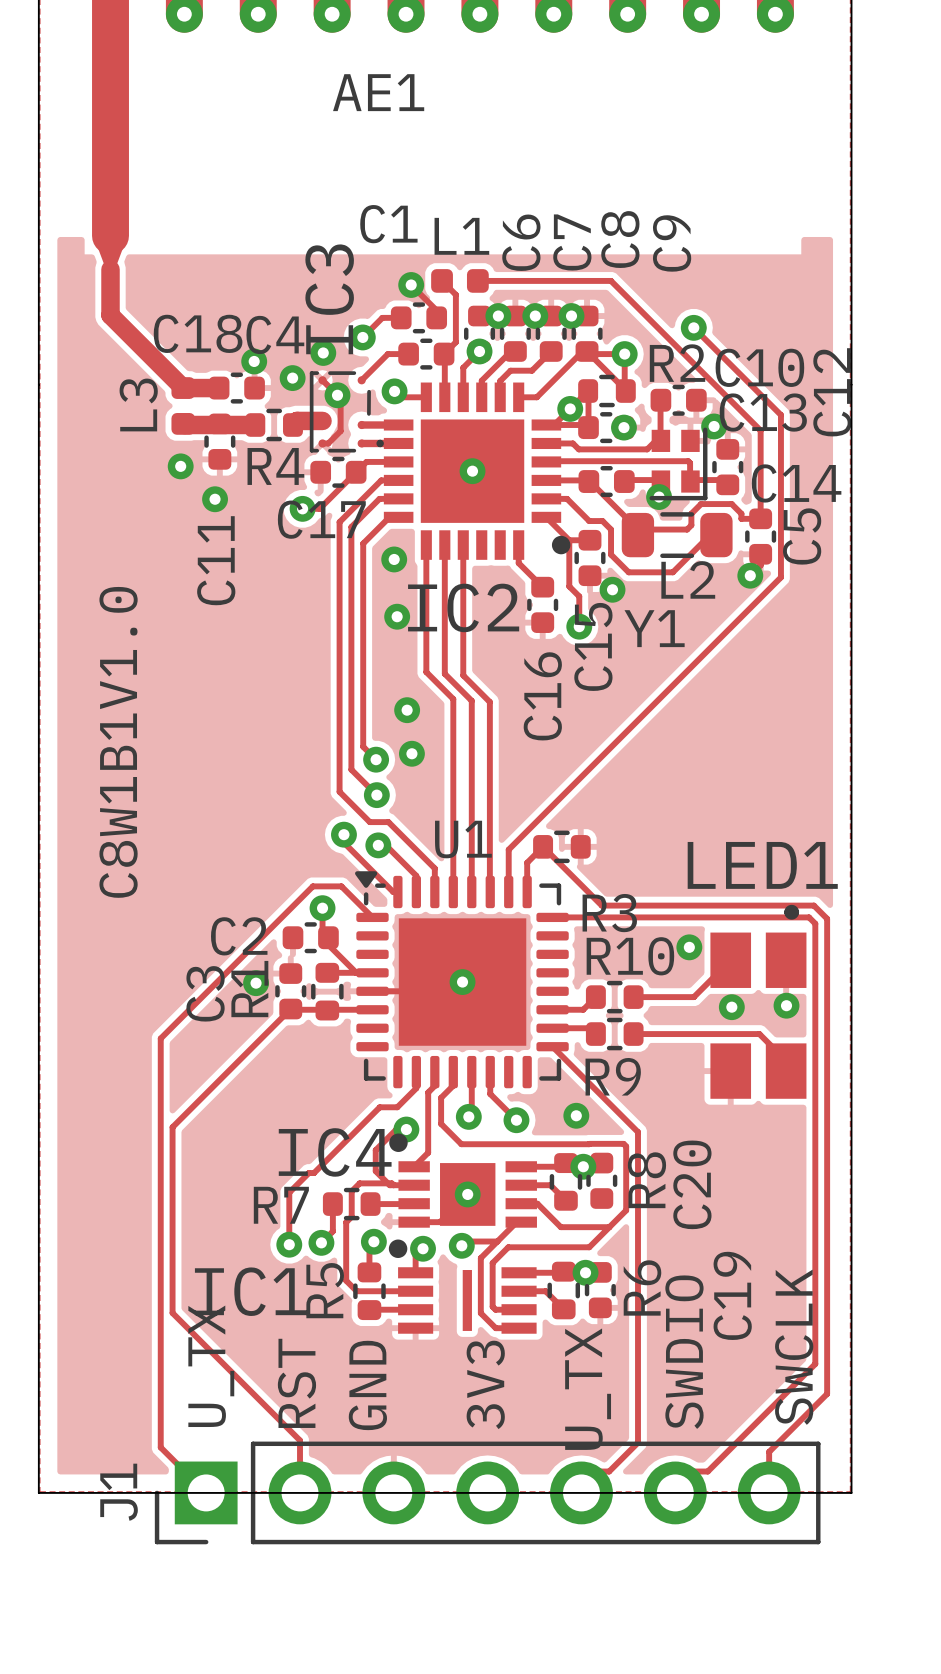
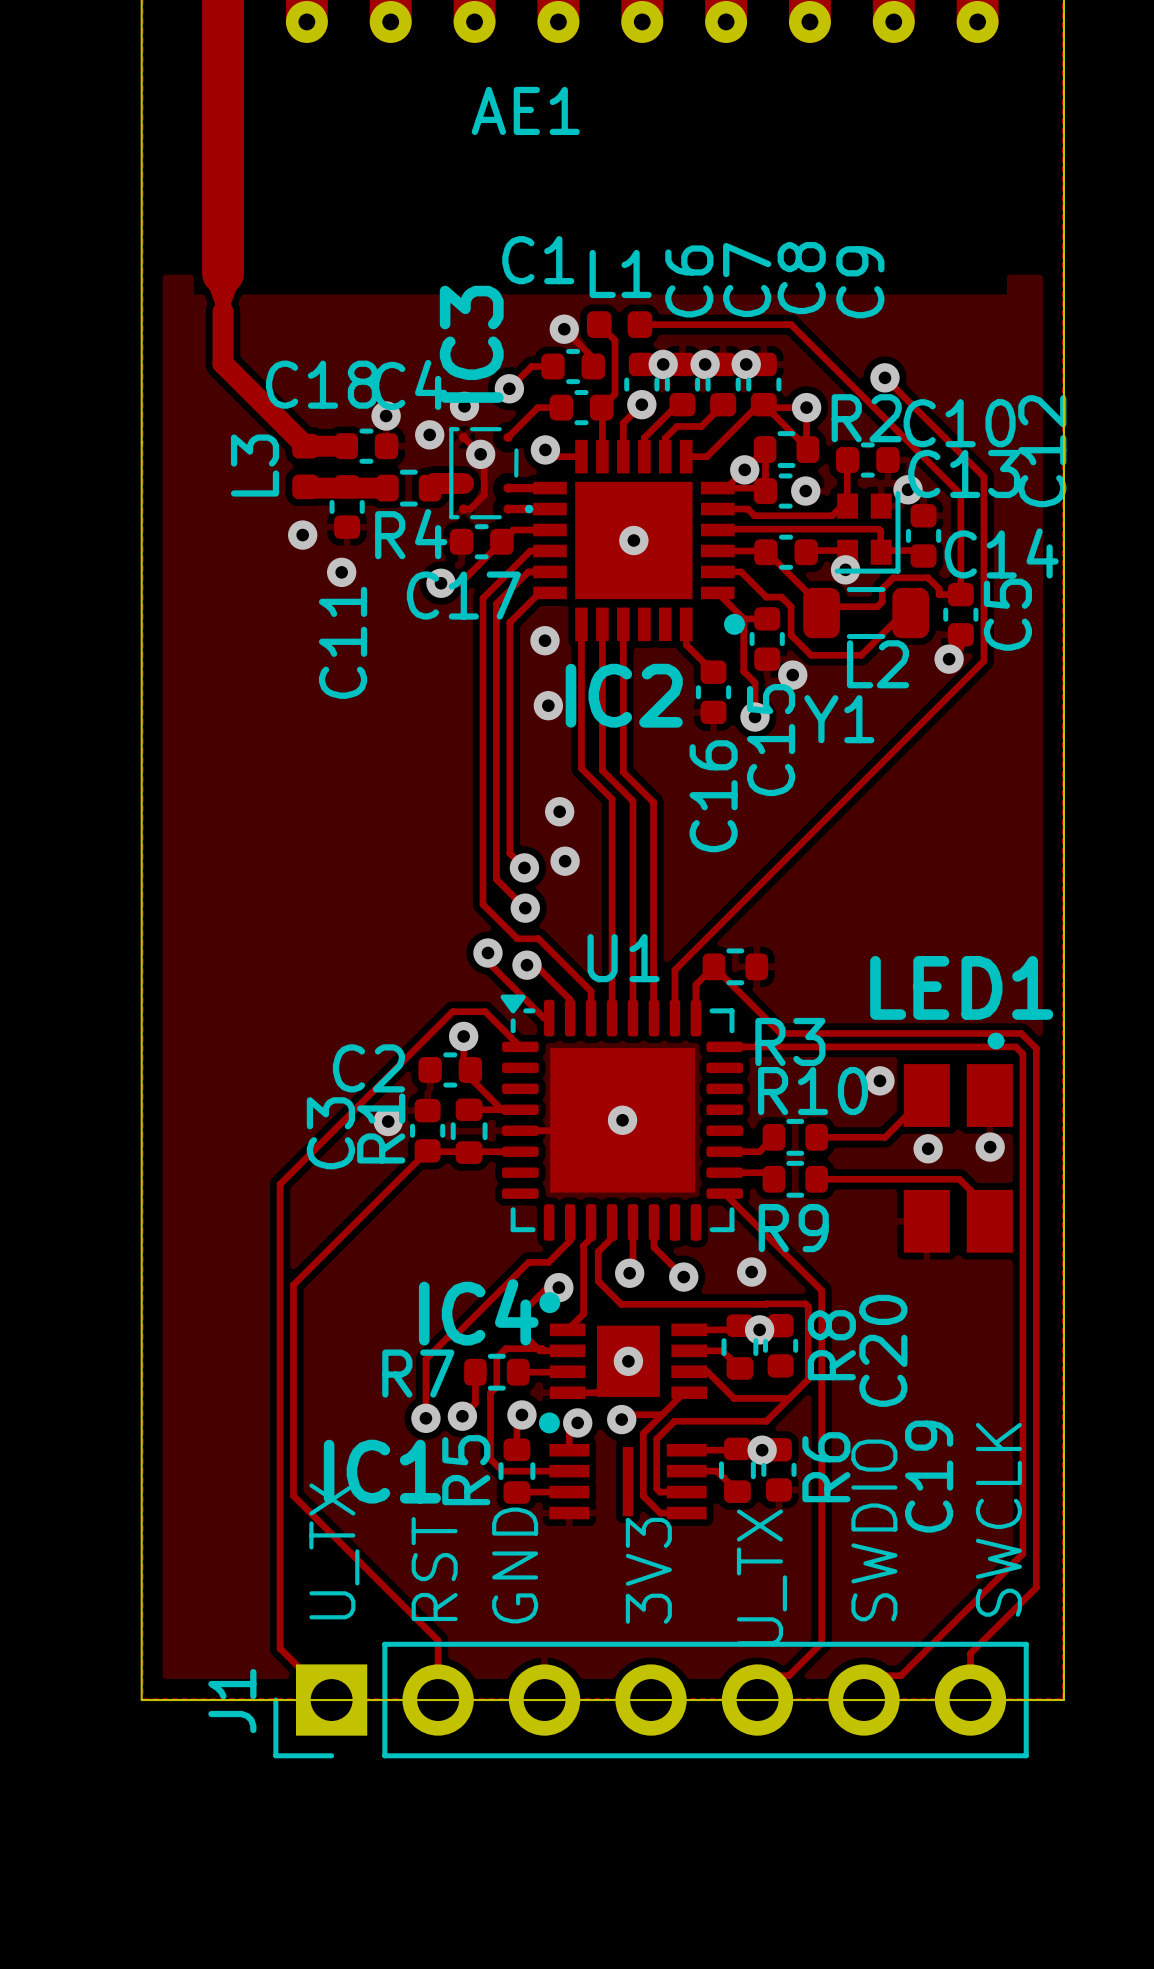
text: C8W1B1V1.0 (118, 742) -> none

